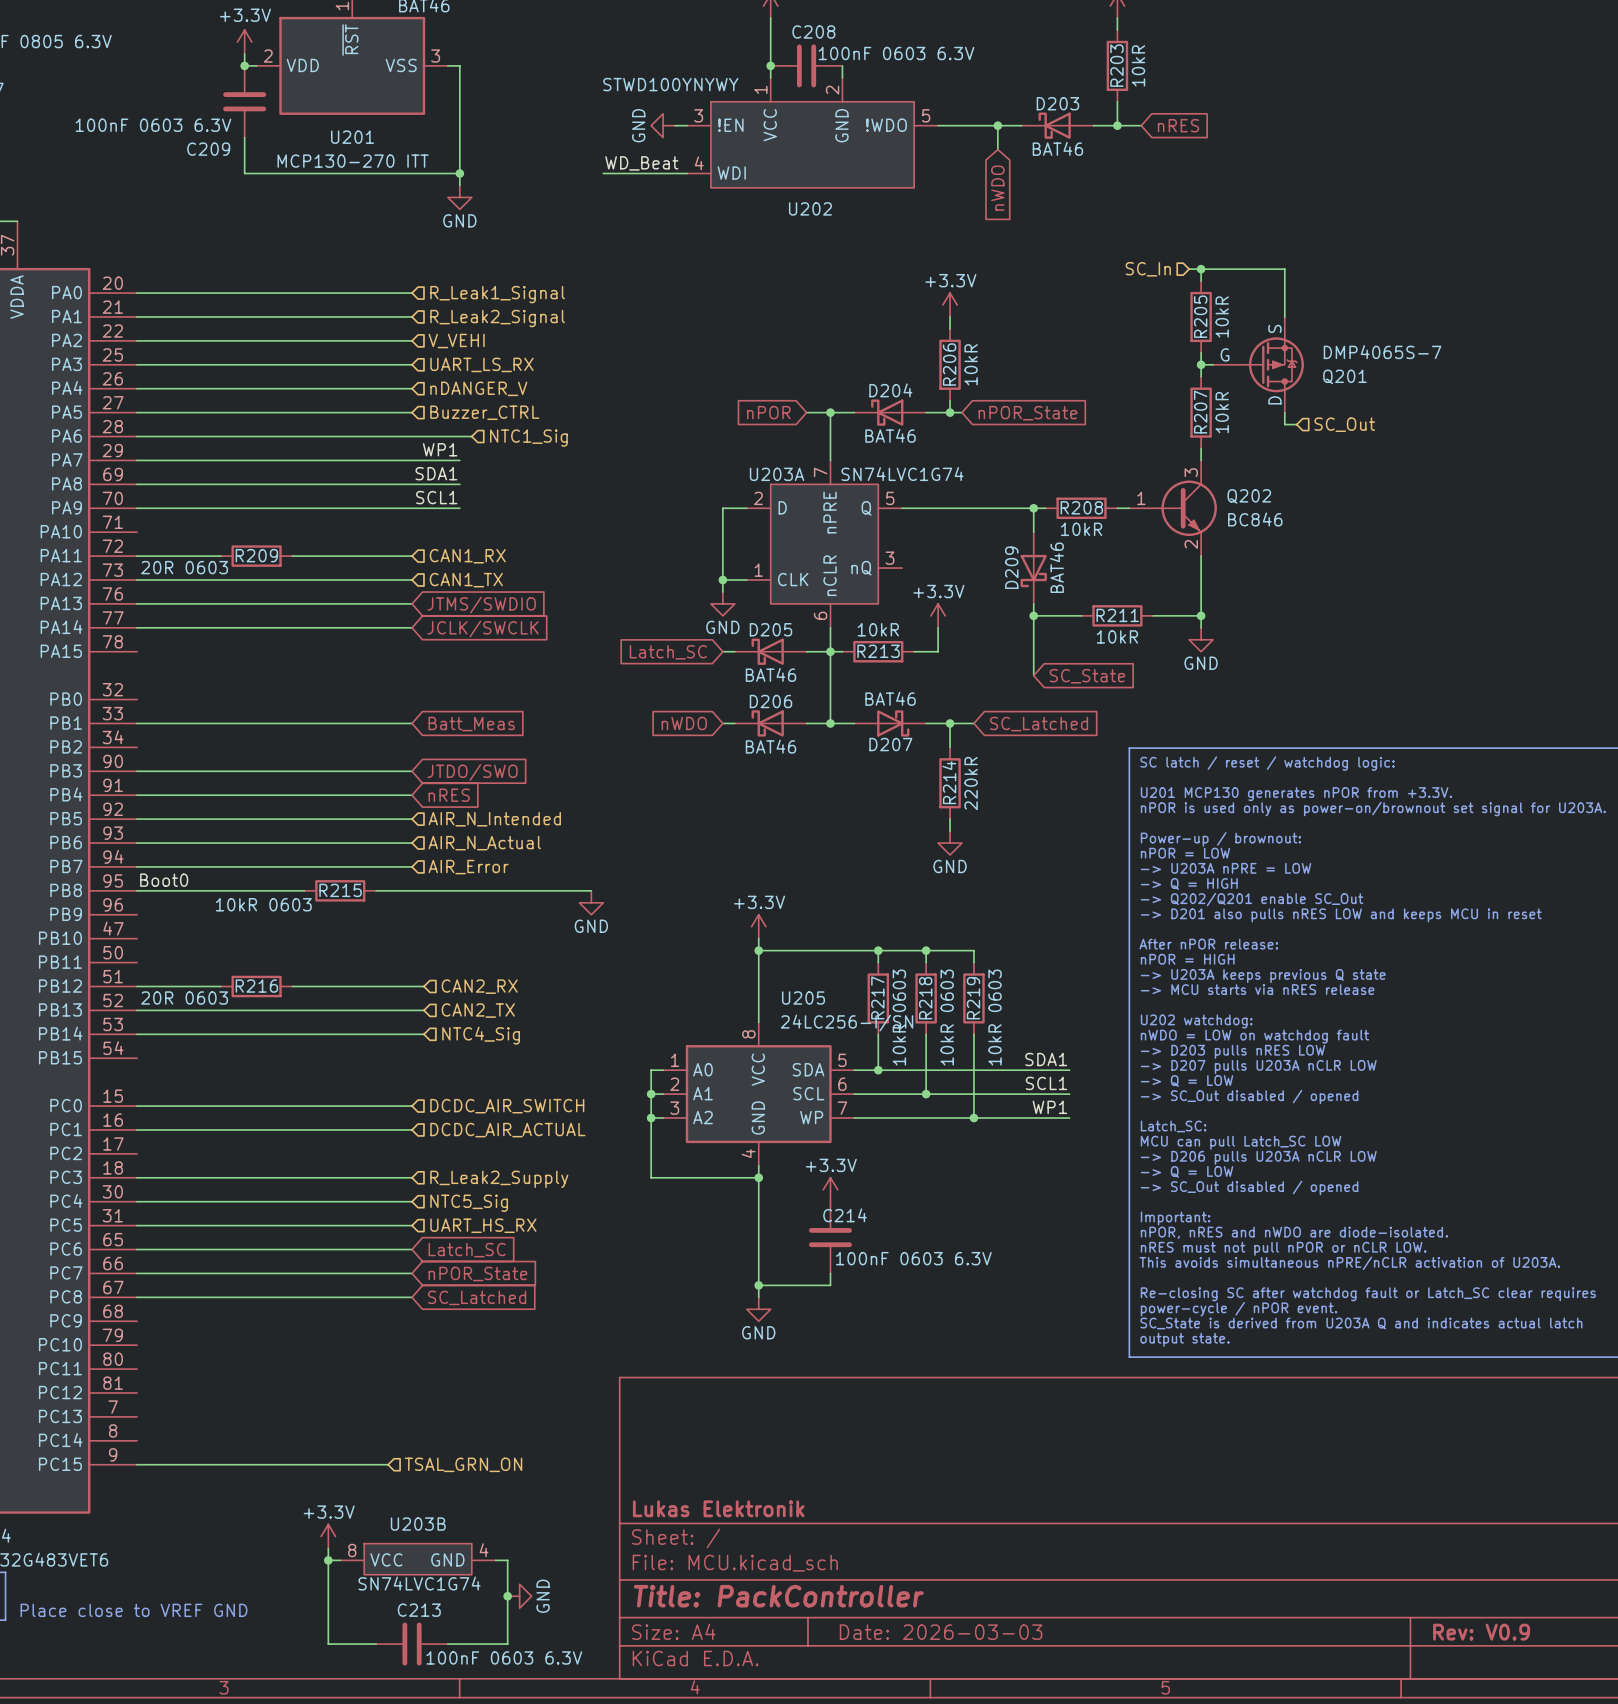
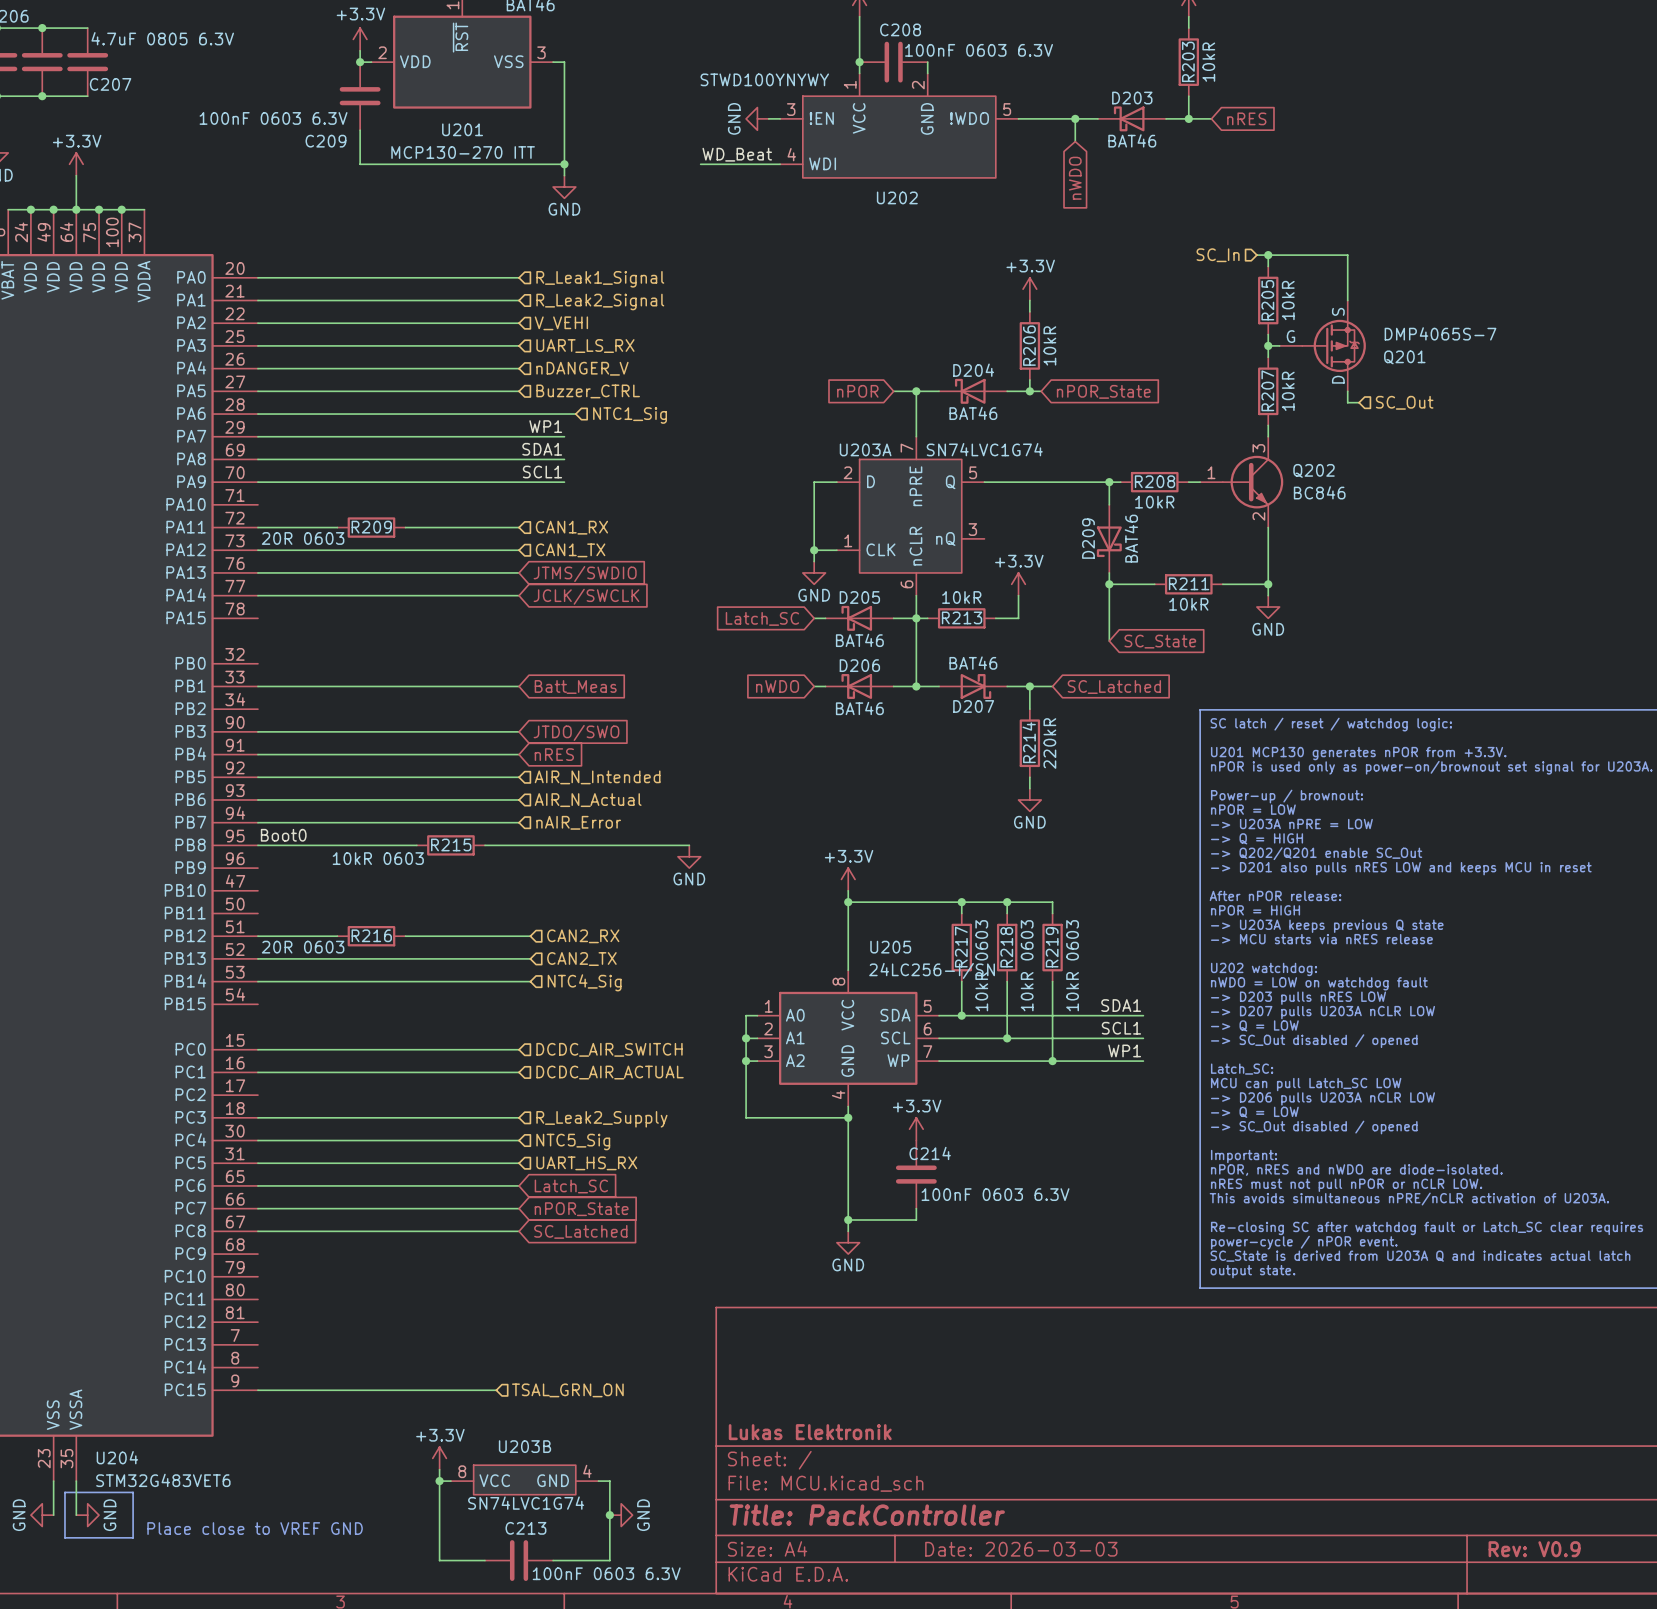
hierarchical label: AIR_Error (468, 867) -> nAIR_Error (578, 822)

